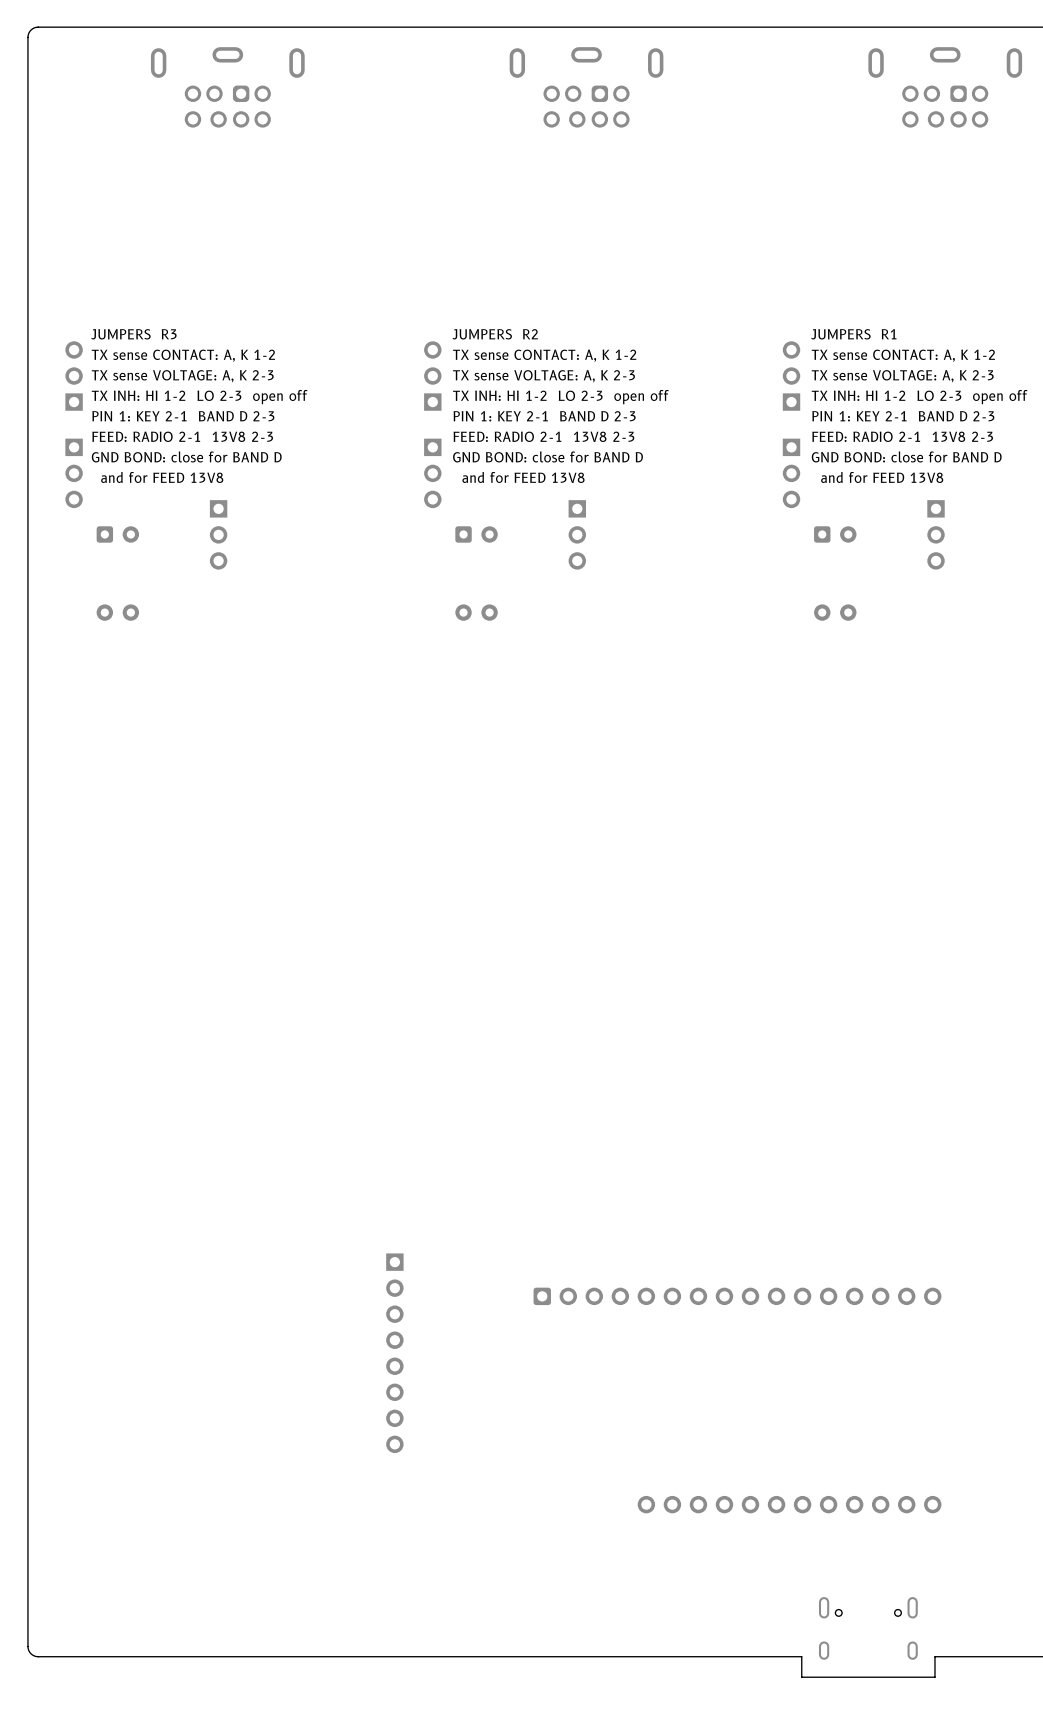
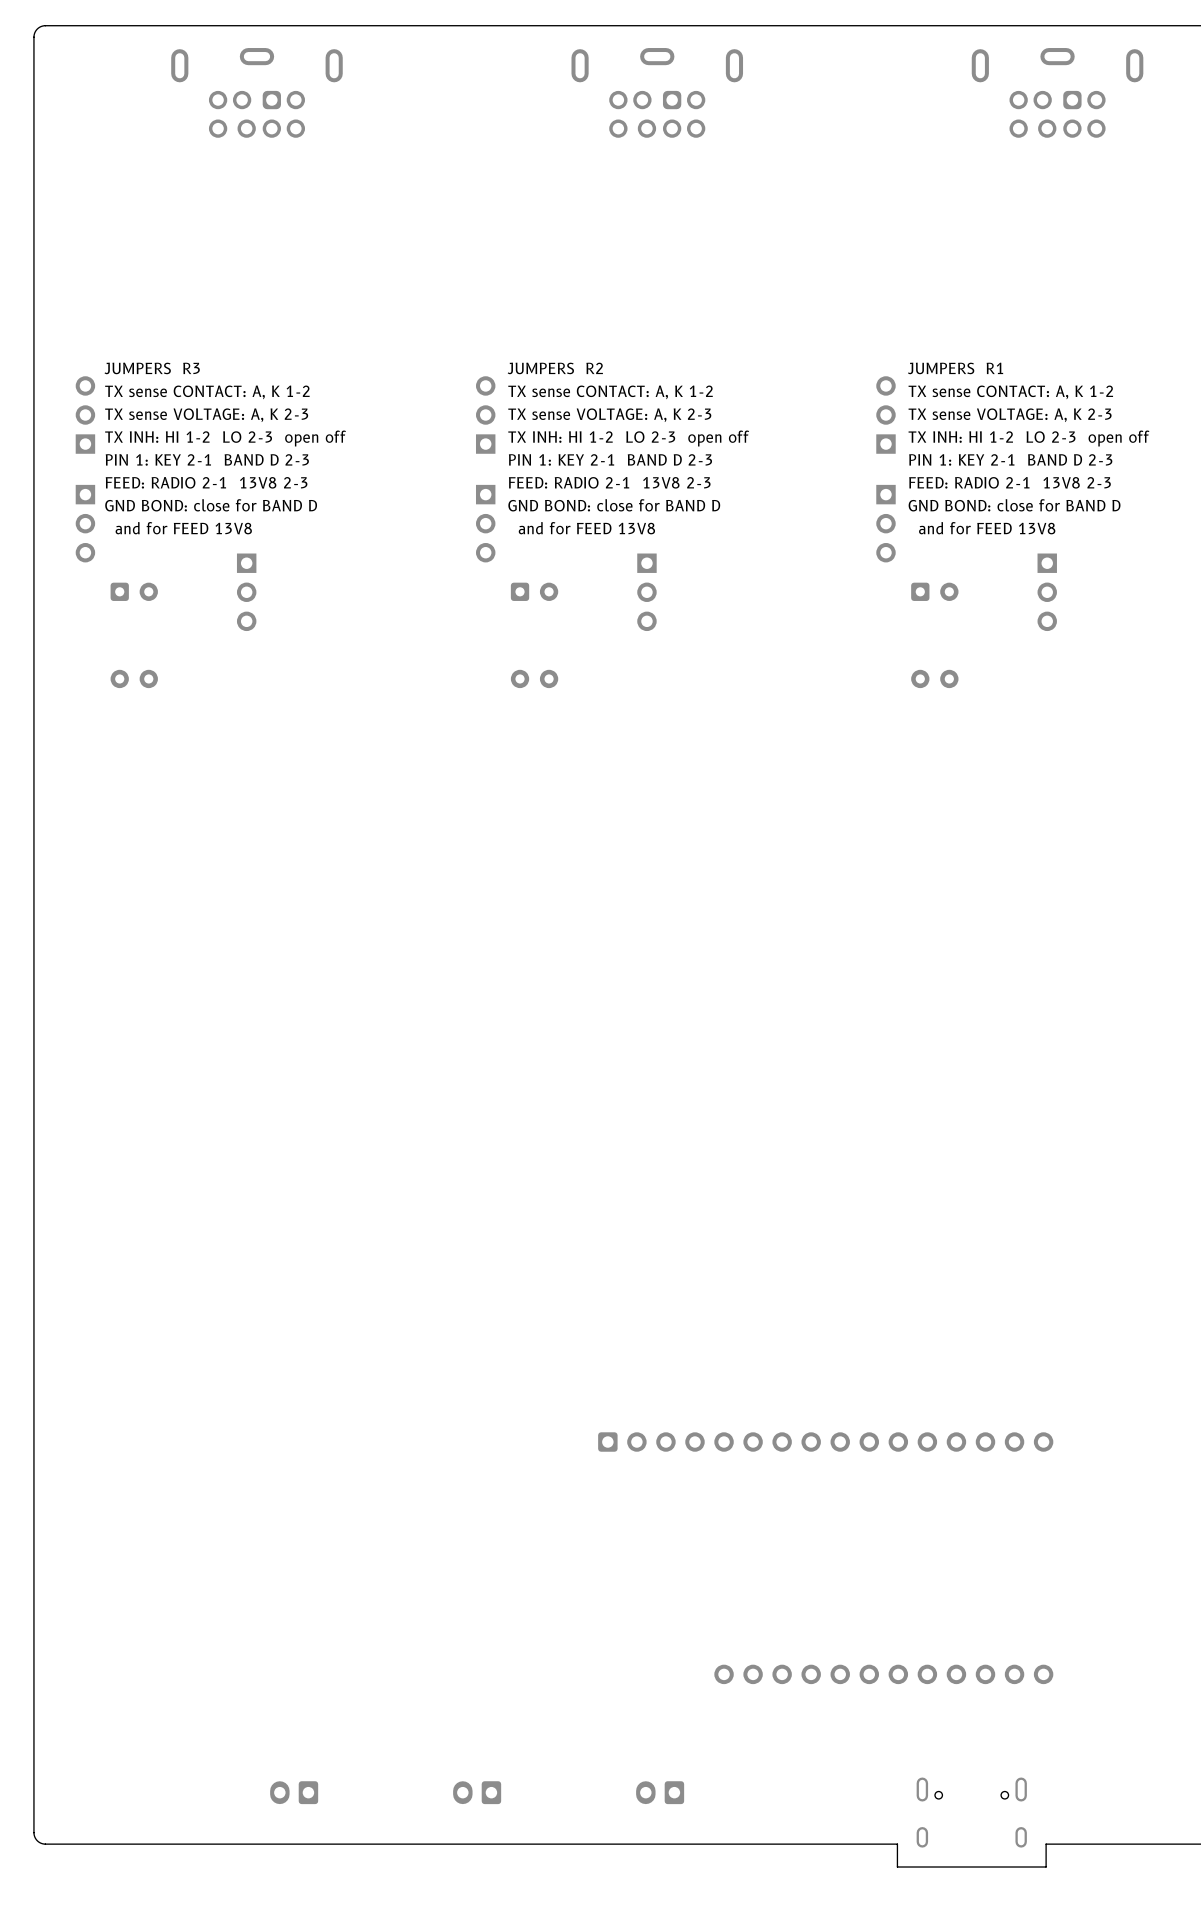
part: (394, 1353) -> none
part: none -> (294, 1792)
part: none -> (477, 1792)
part: none -> (660, 1792)

